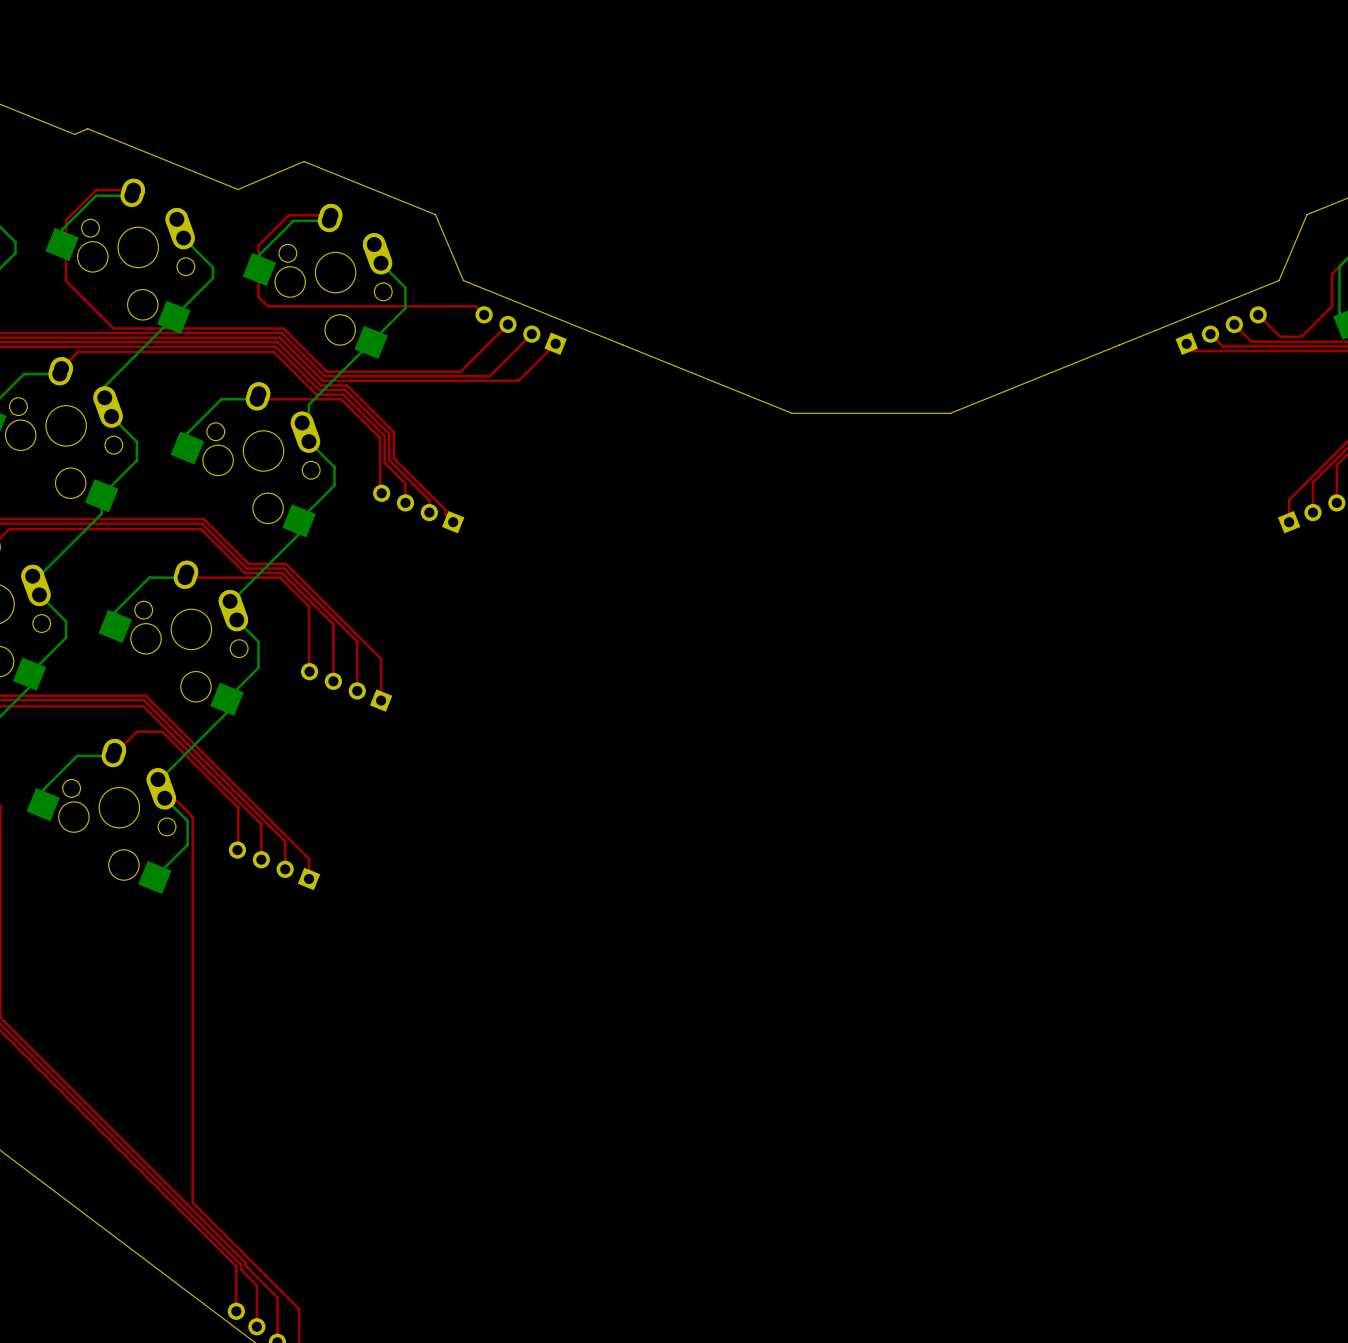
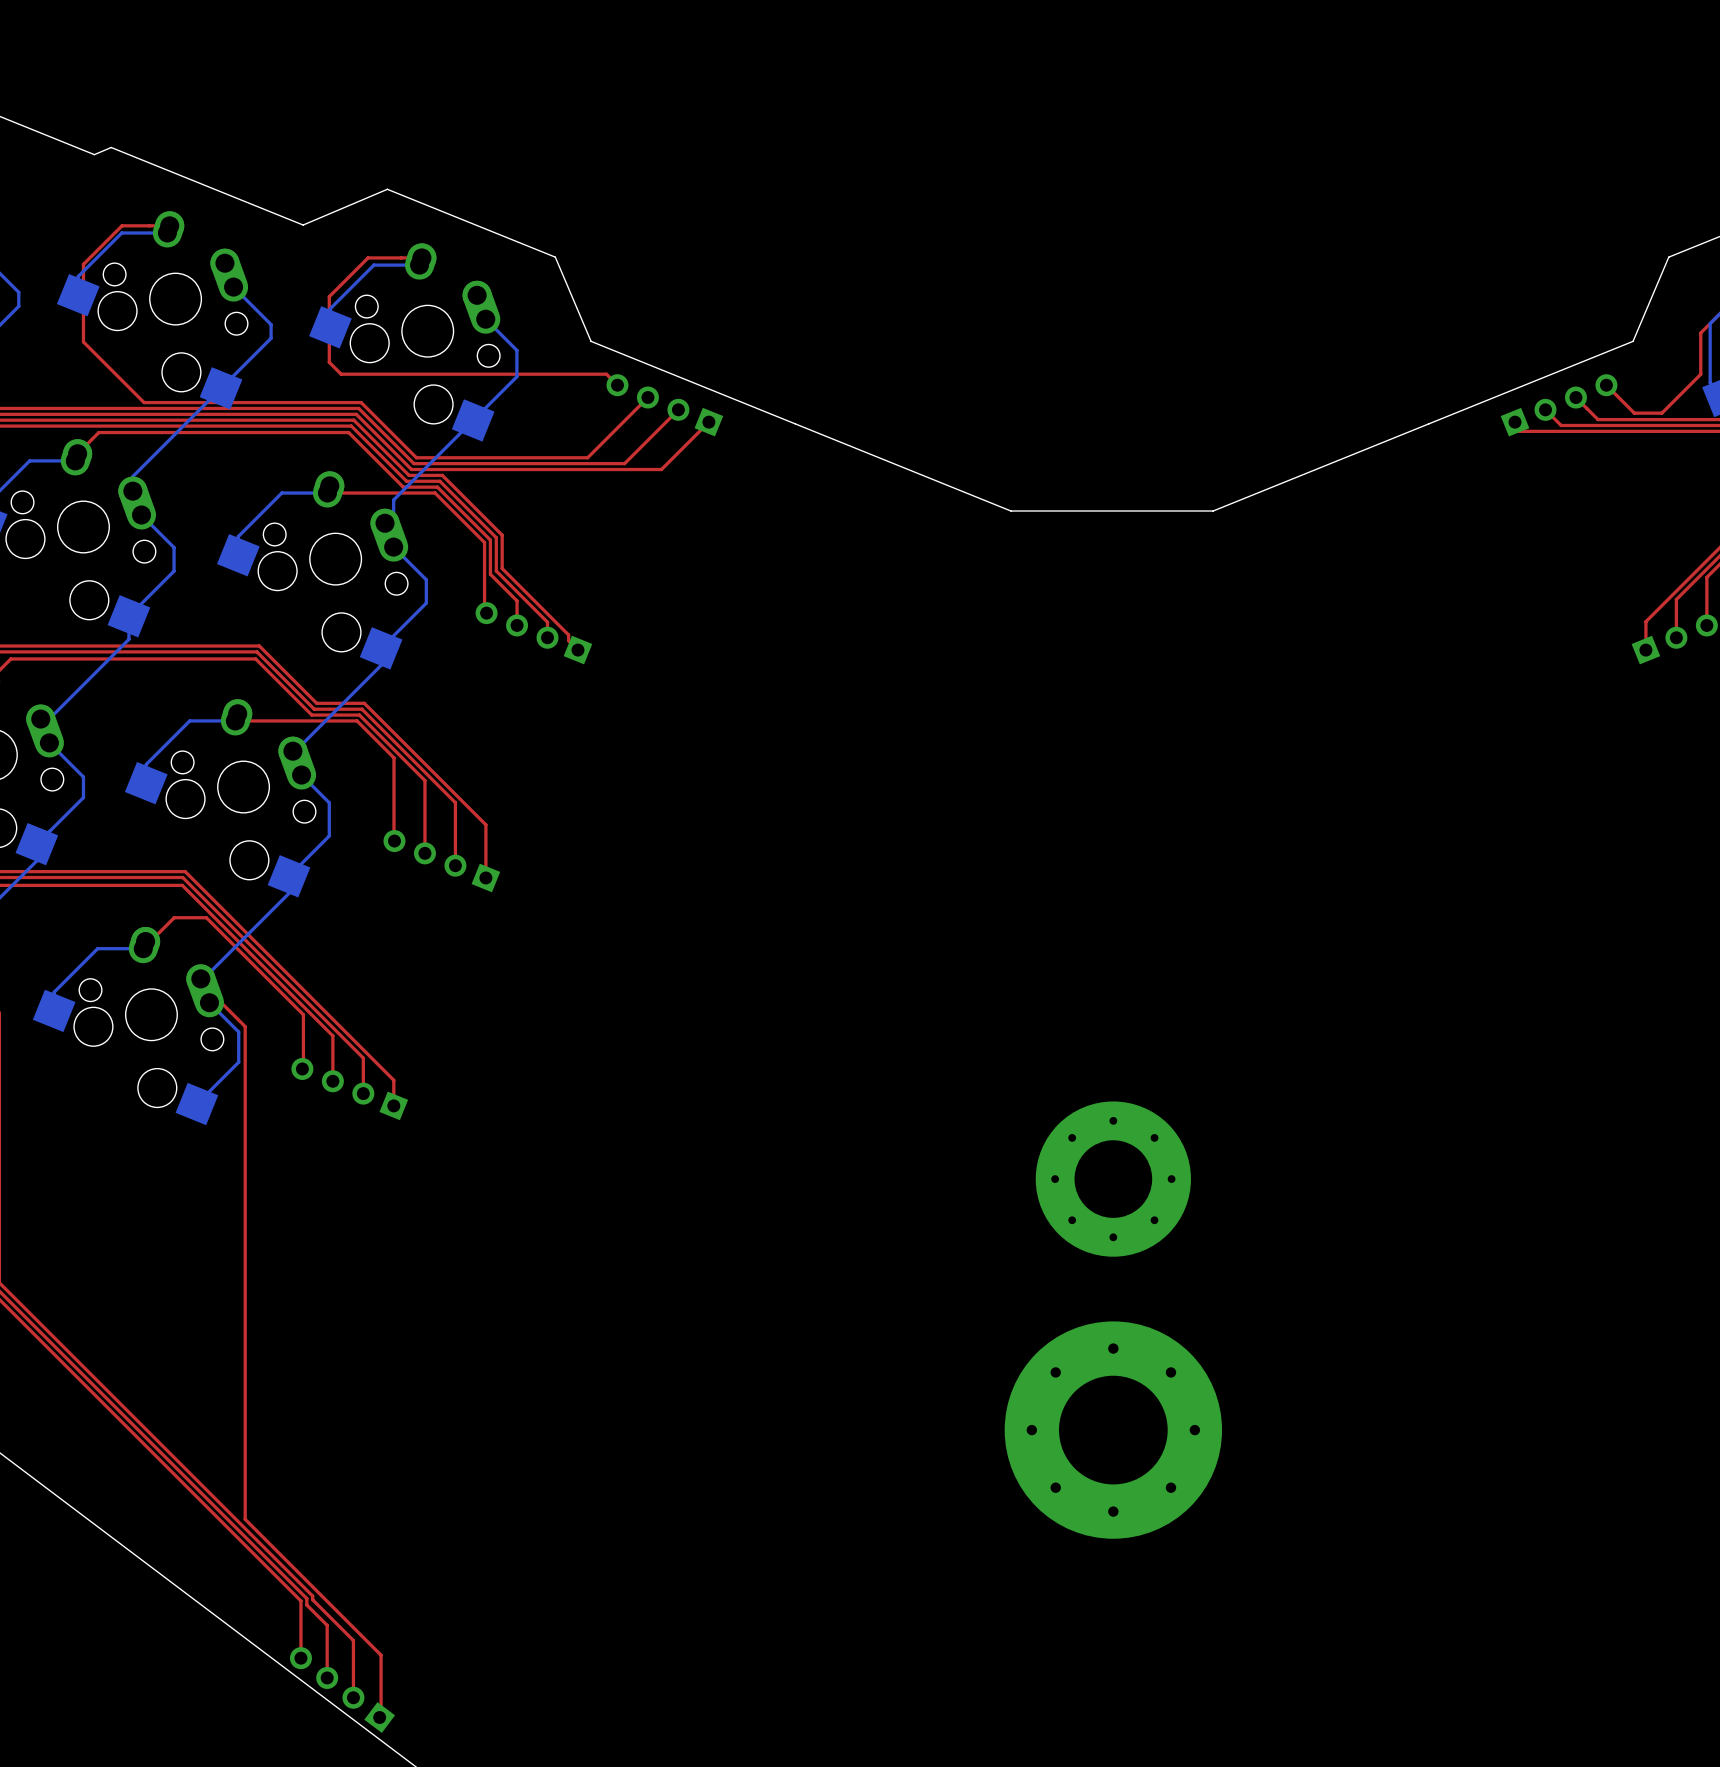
part: none -> (1113, 1179)
part: none -> (1113, 1430)

